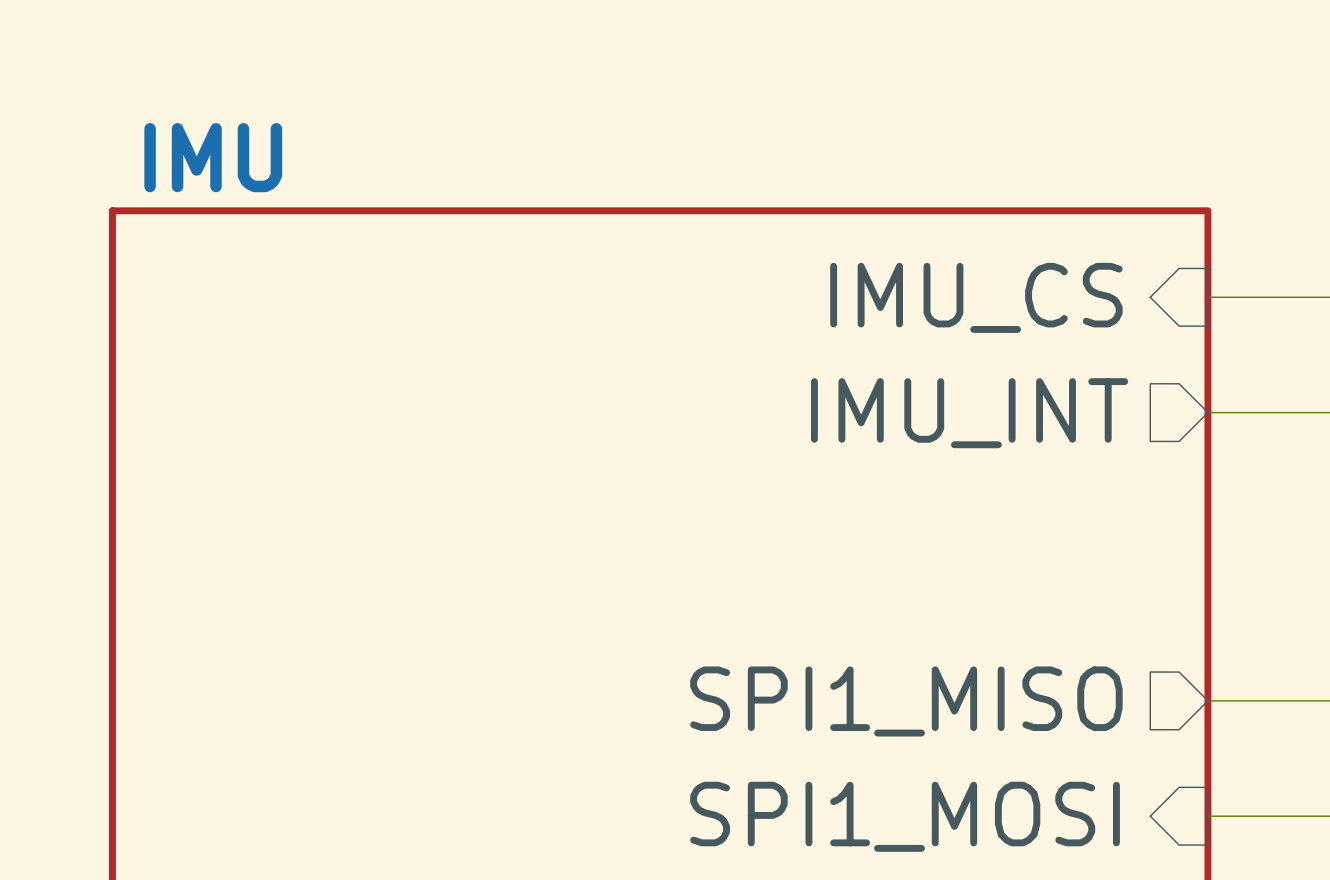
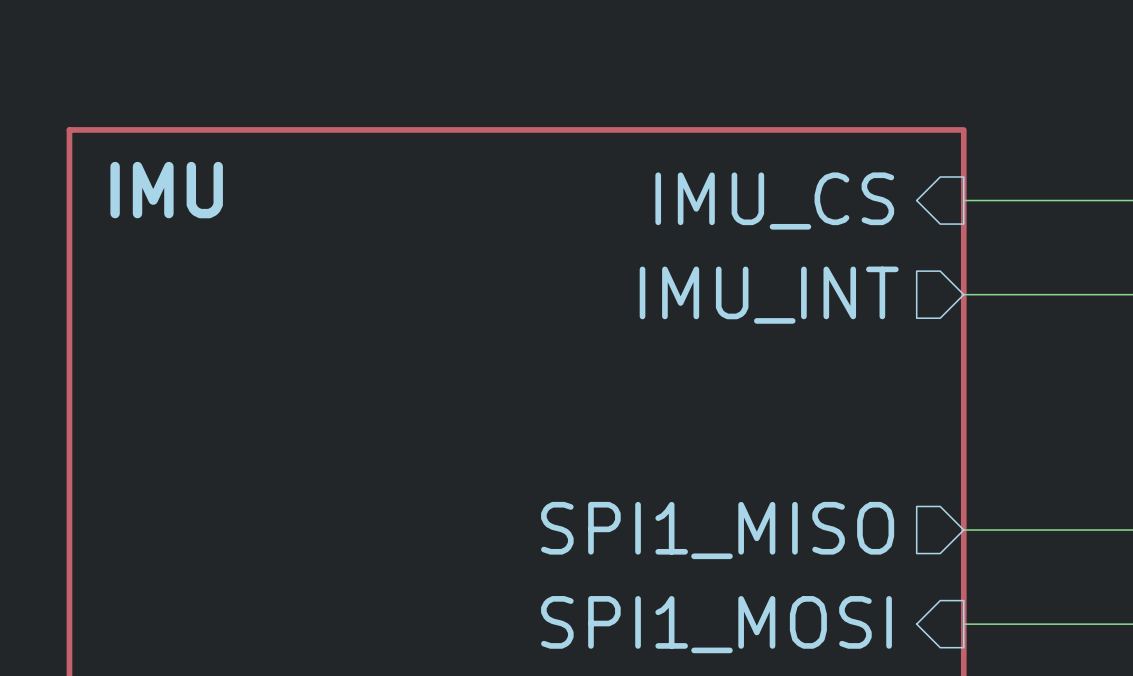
sheet IMU name position: IMU (213, 157) -> IMU (166, 190)

